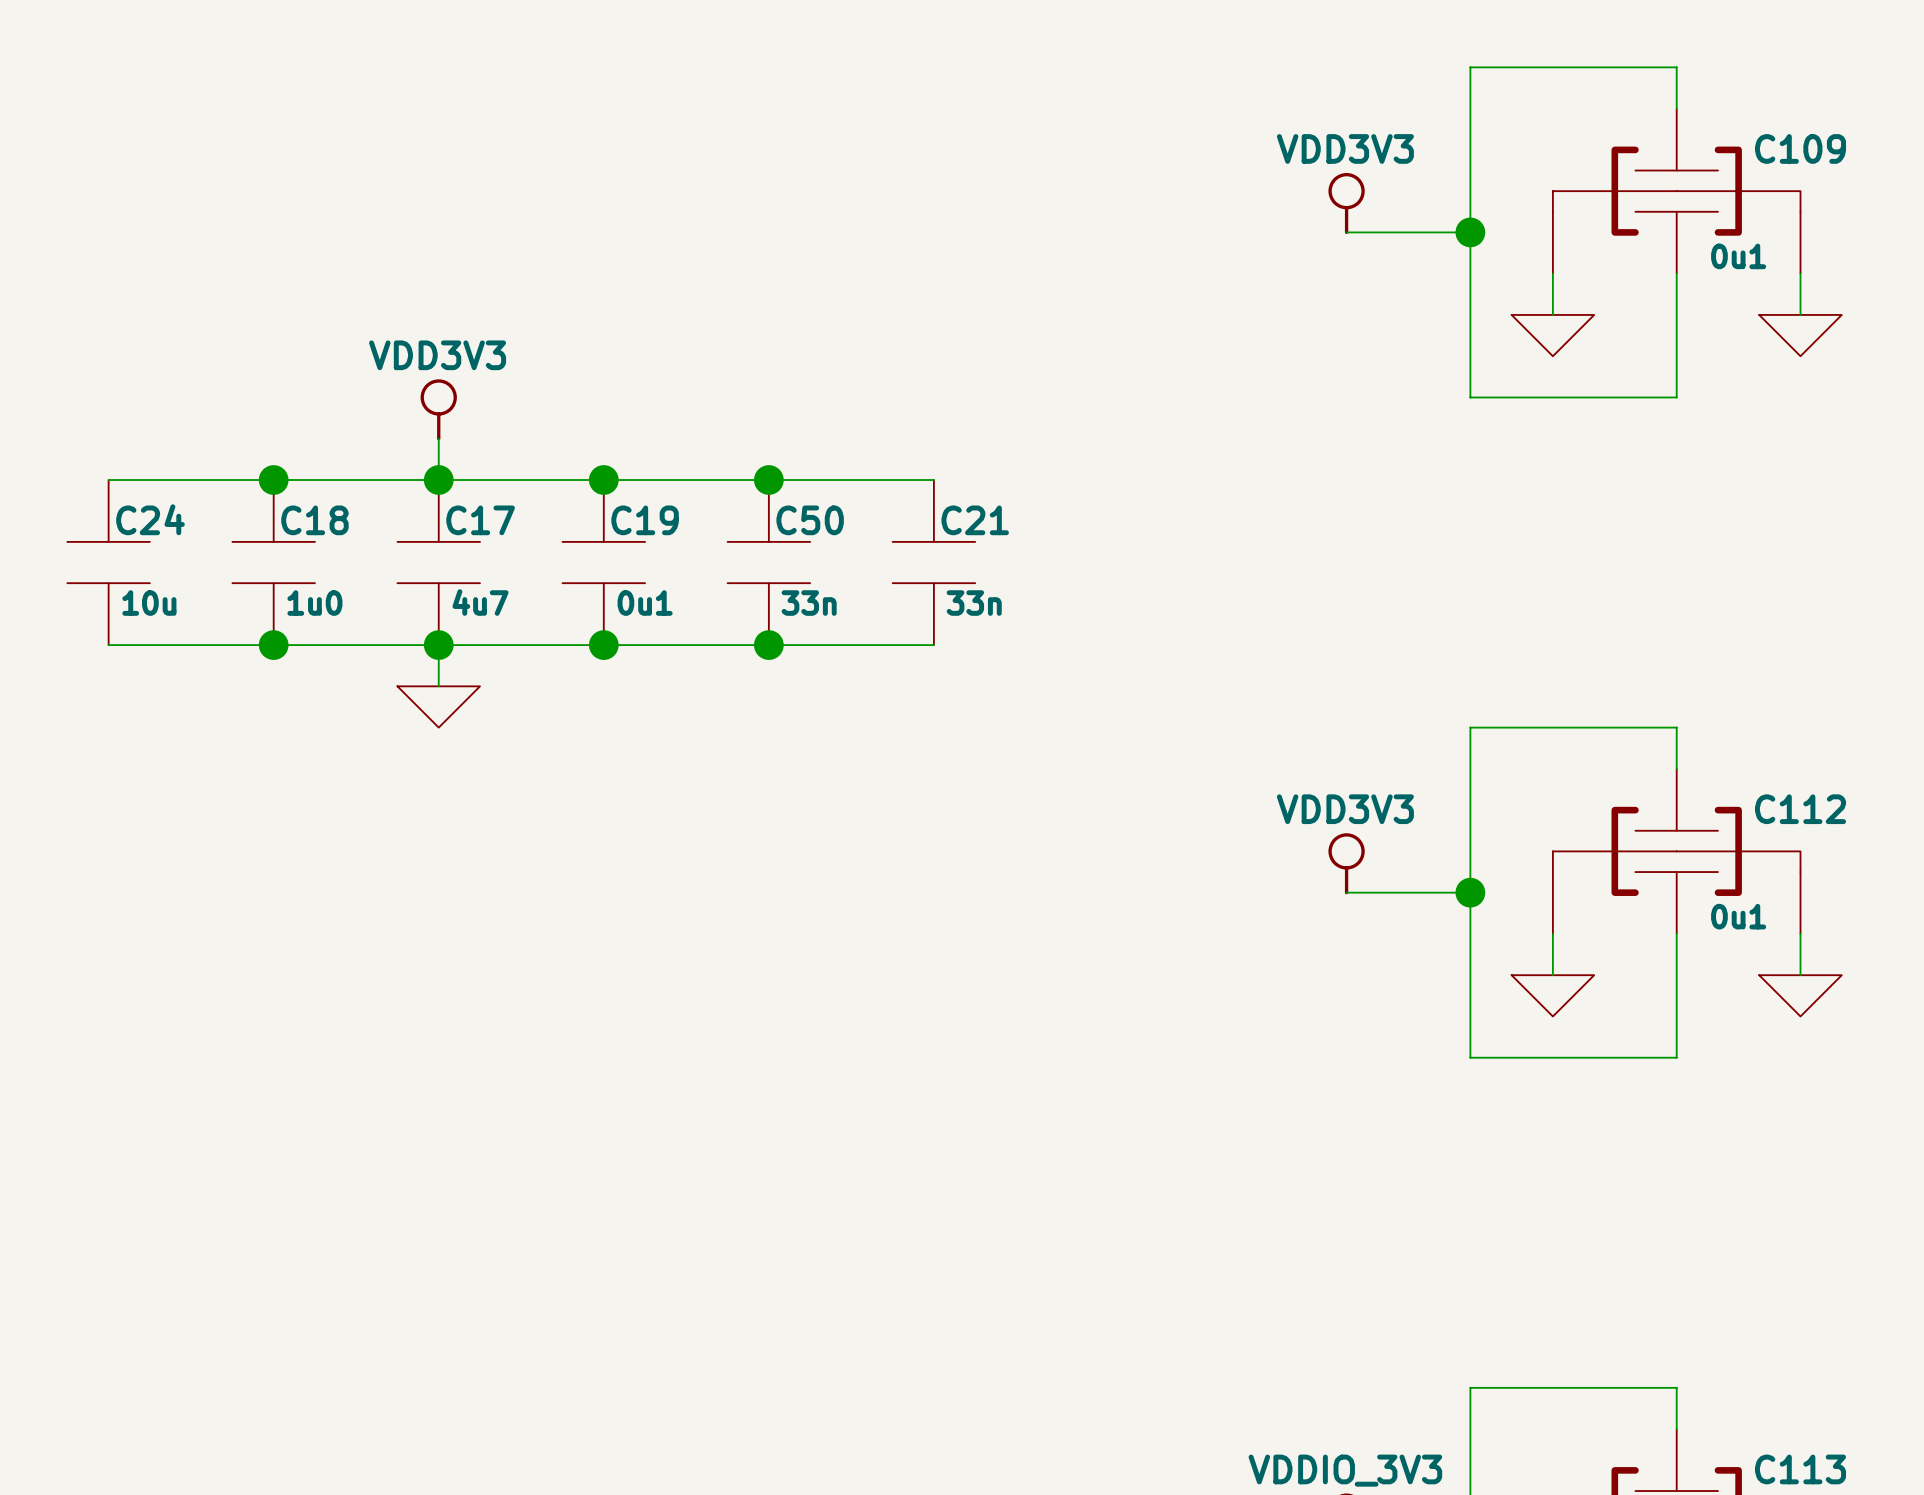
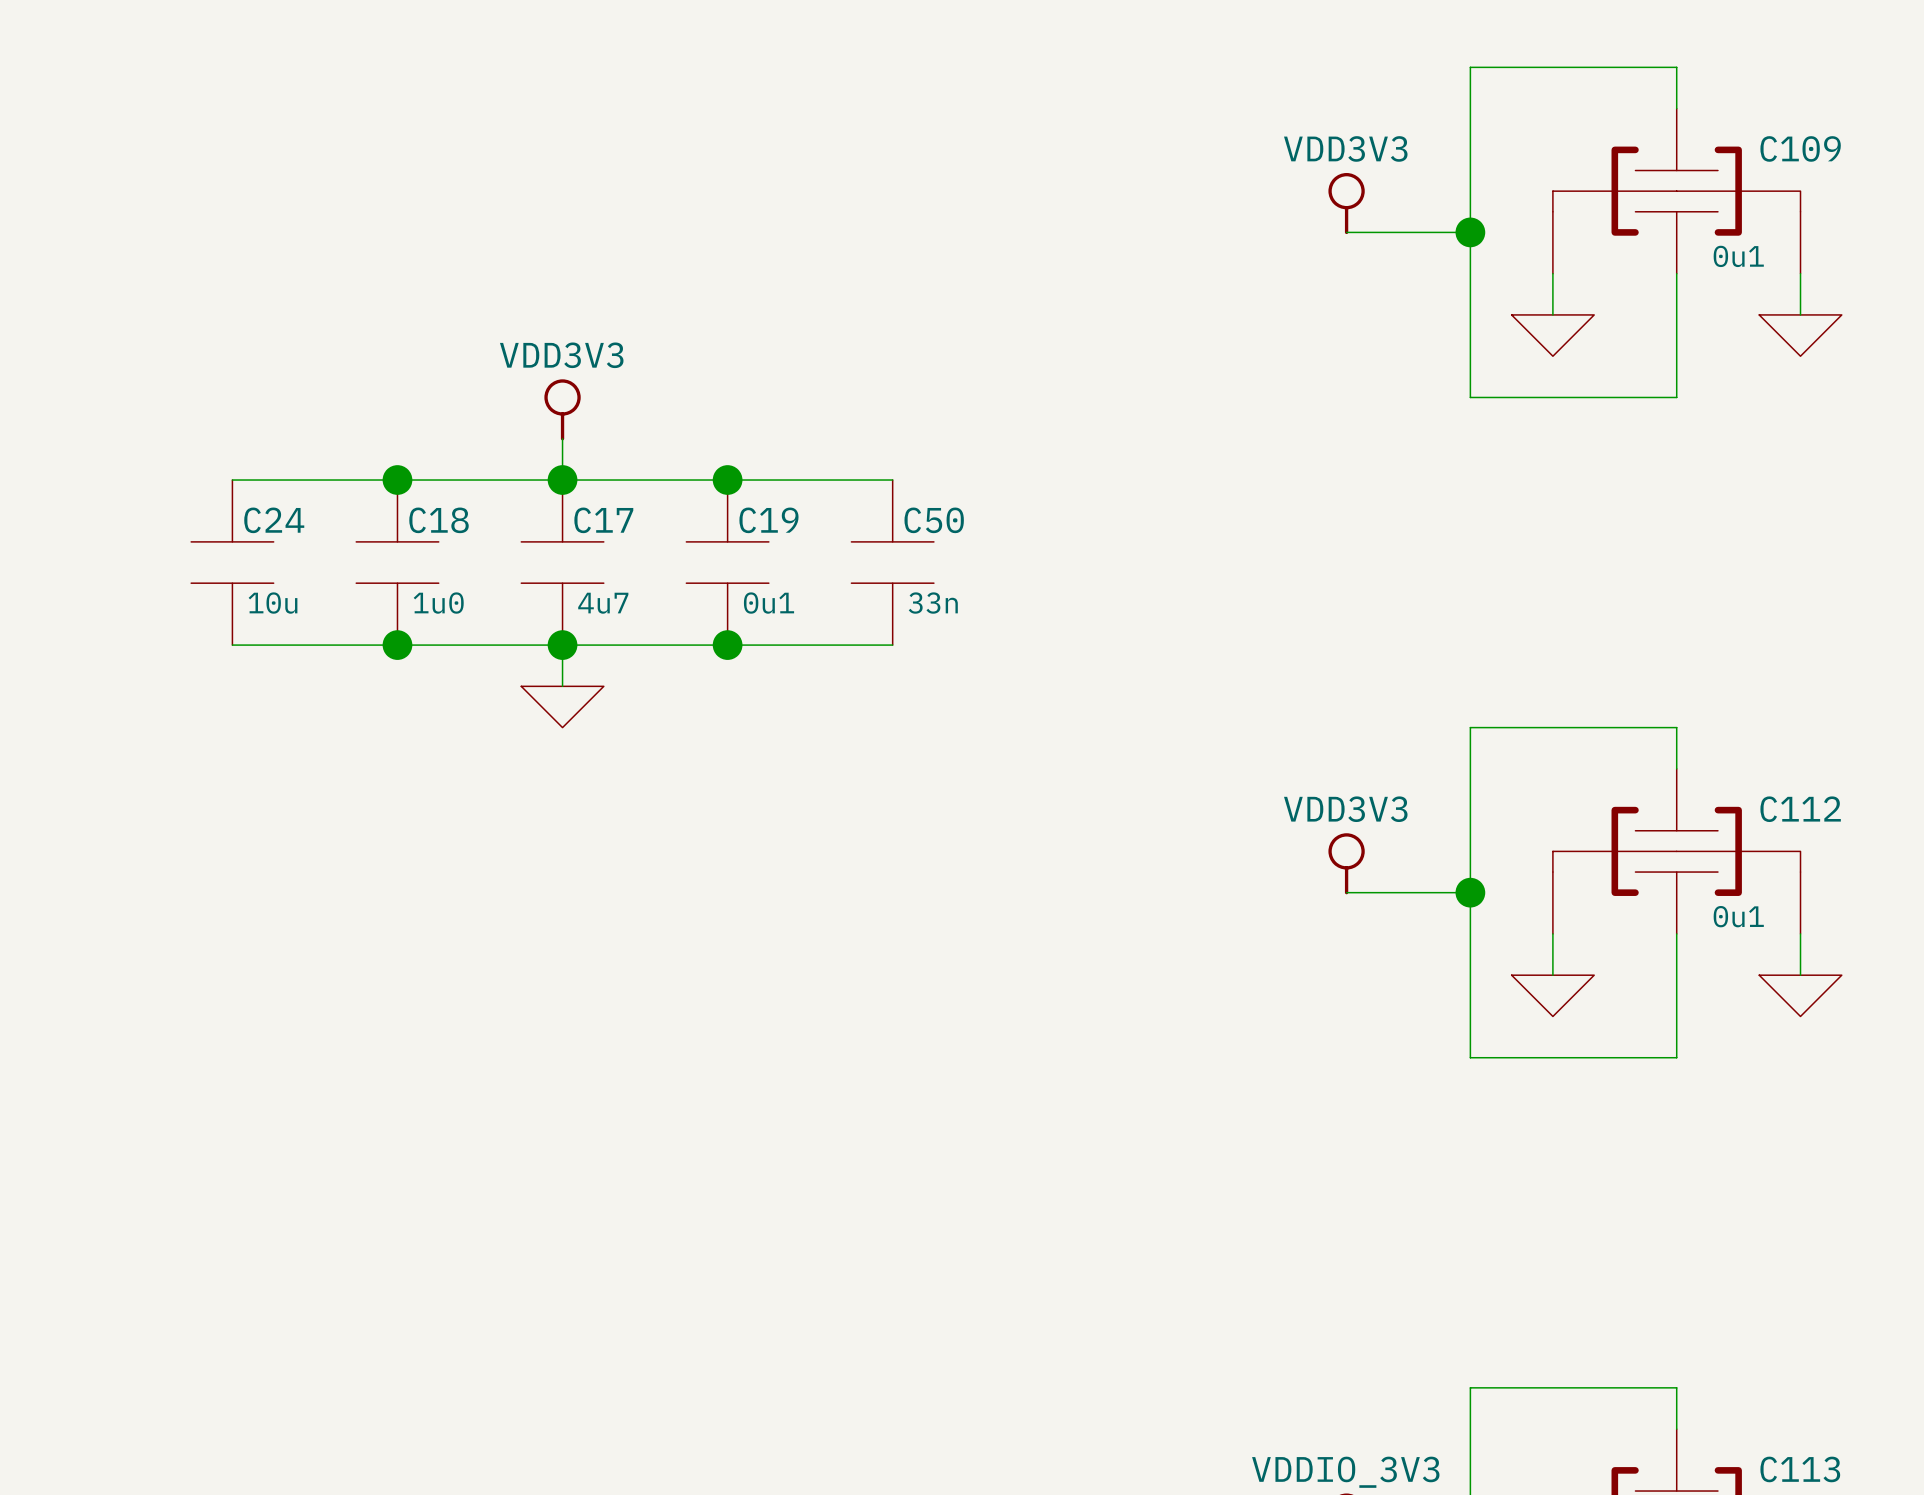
power symbol position: VDD3V3 (438, 409) -> VDD3V3 (562, 409)
wire: (438, 438) (438, 480) -> (562, 438) (562, 480)
wire: (108, 480) (232, 480) -> none
junction: (273, 480) -> none
junction position: (438, 480) -> (397, 480)
junction position: (603, 480) -> (562, 480)
junction position: (768, 480) -> (727, 480)
wire: (892, 480) (933, 480) -> none
C24 position: (108, 562) -> (232, 562)
C18 position: (273, 562) -> (397, 562)
C17 position: (438, 562) -> (562, 562)
C19 position: (603, 562) -> (727, 562)
C50 position: (768, 562) -> (892, 562)
C21: 33n (933, 562) -> none
wire: (108, 645) (232, 645) -> none
junction: (273, 645) -> none
wire: (438, 645) (438, 686) -> (562, 645) (562, 686)
junction position: (438, 645) -> (397, 645)
junction position: (603, 645) -> (562, 645)
junction position: (768, 645) -> (727, 645)
wire: (892, 645) (933, 645) -> none
power symbol position: (438, 706) -> (562, 706)

